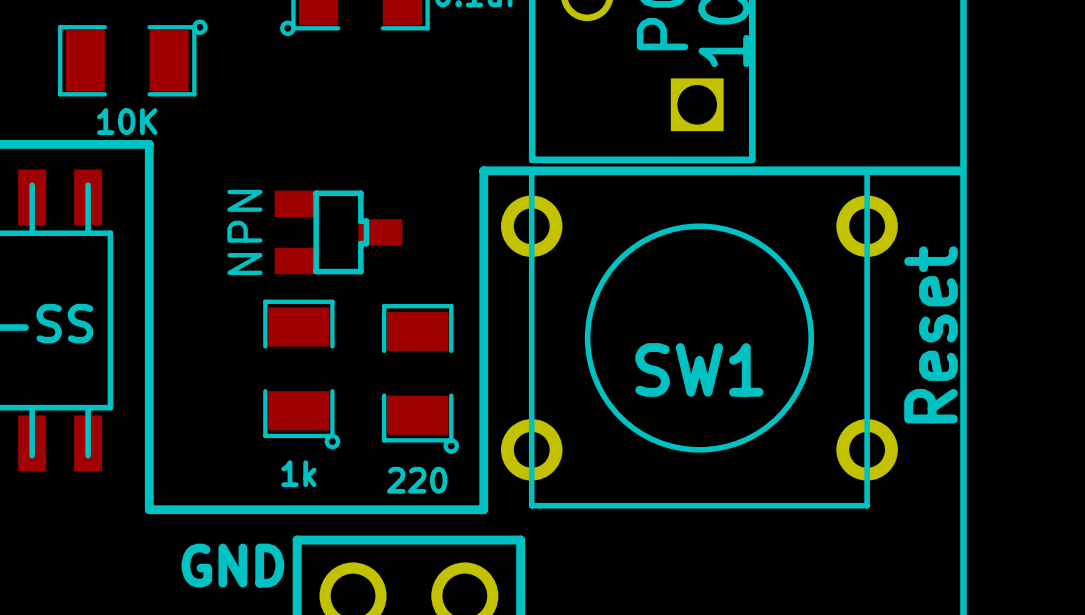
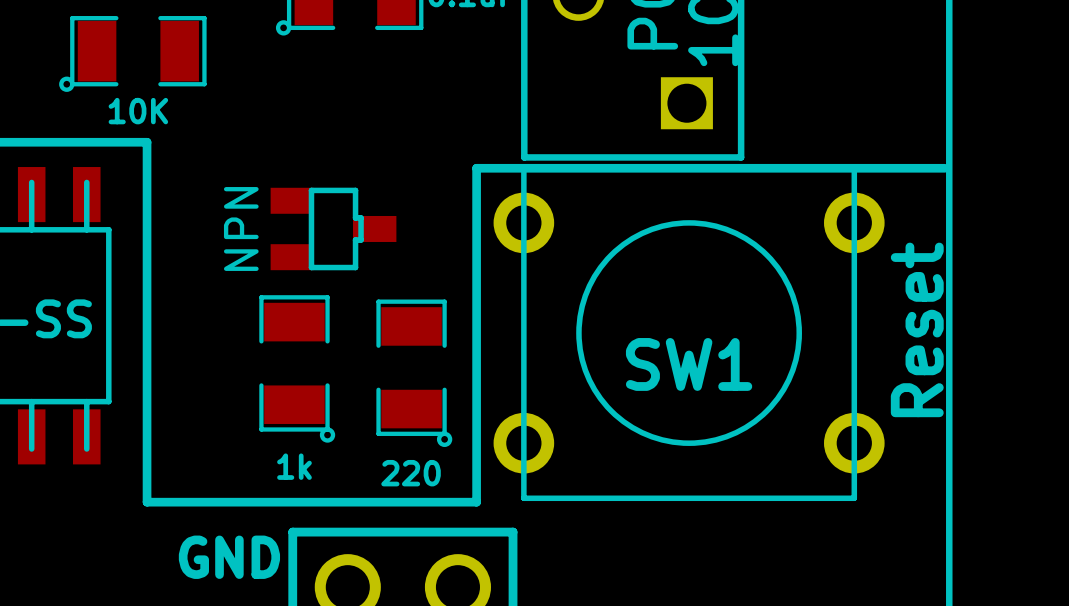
part rotation: 0° (132, 57) -> 180° (132, 53)

